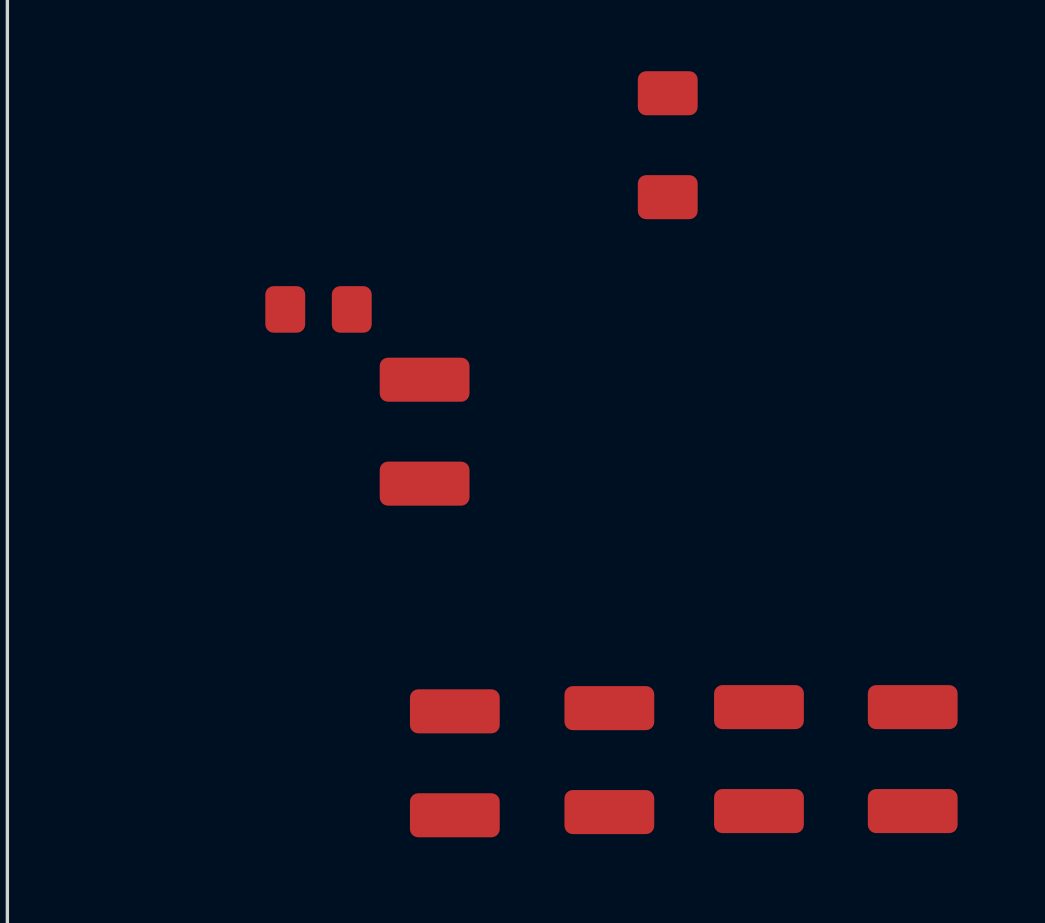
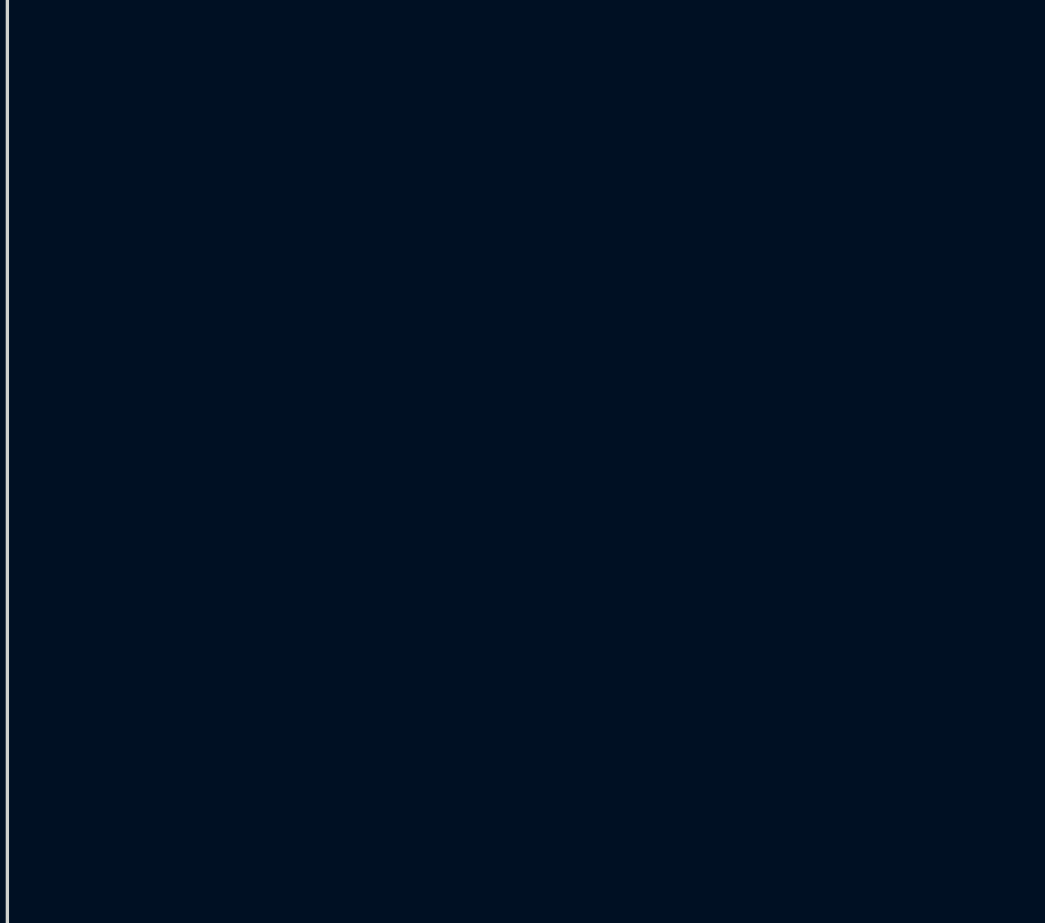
part: (667, 145) -> none
part: (318, 309) -> none
part: (424, 431) -> none
part: (758, 759) -> none
part: (912, 759) -> none
part: (609, 760) -> none
part: (454, 763) -> none

